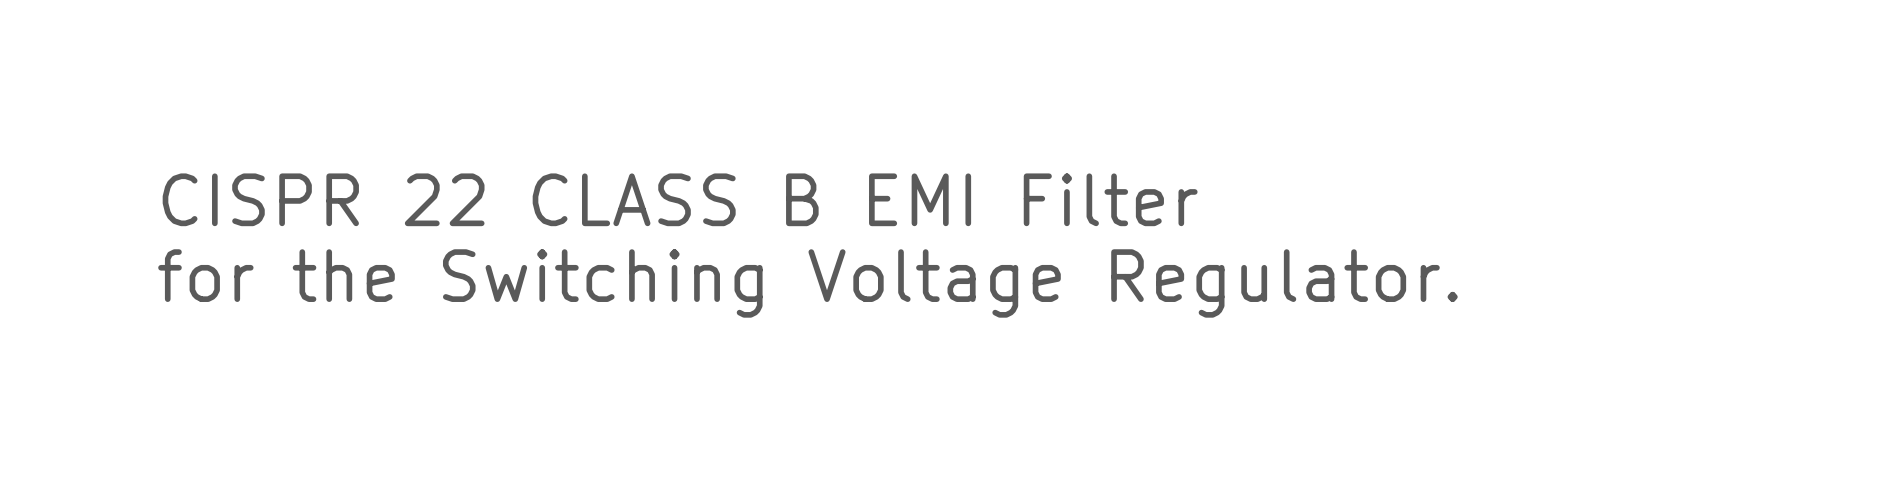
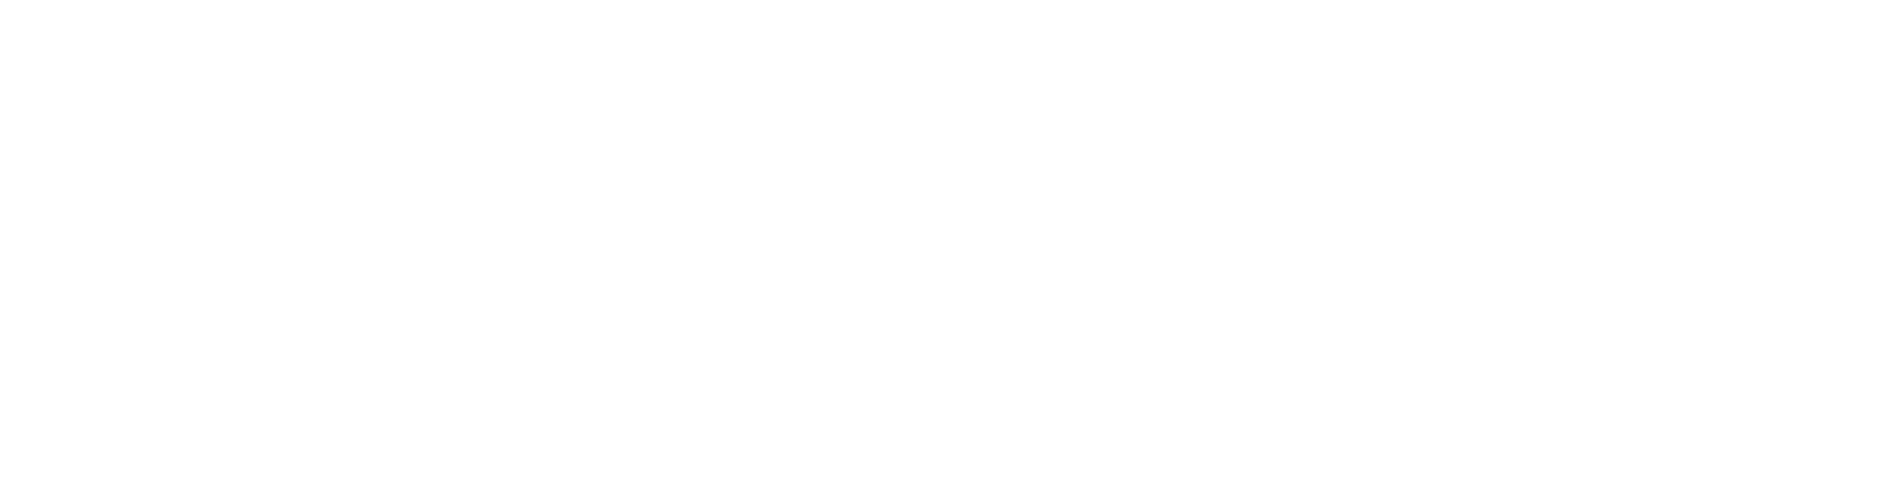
text: CISPR 22 CLASS B EMI Filter (680, 199) -> none
text: for the Switching Voltage Regulator. (807, 283) -> none

